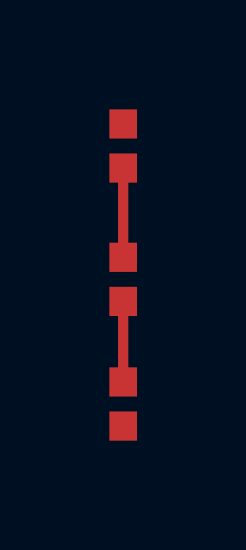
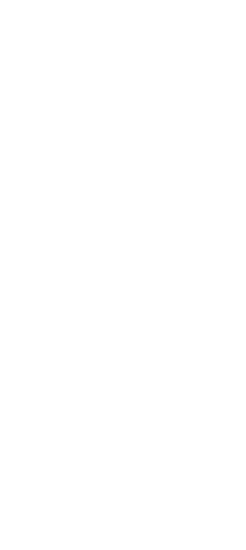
part: (123, 146) -> none
top track: (123, 168) (123, 257) -> none
part: (123, 279) -> none
top track: (123, 301) (123, 381) -> none
part: (123, 403) -> none

